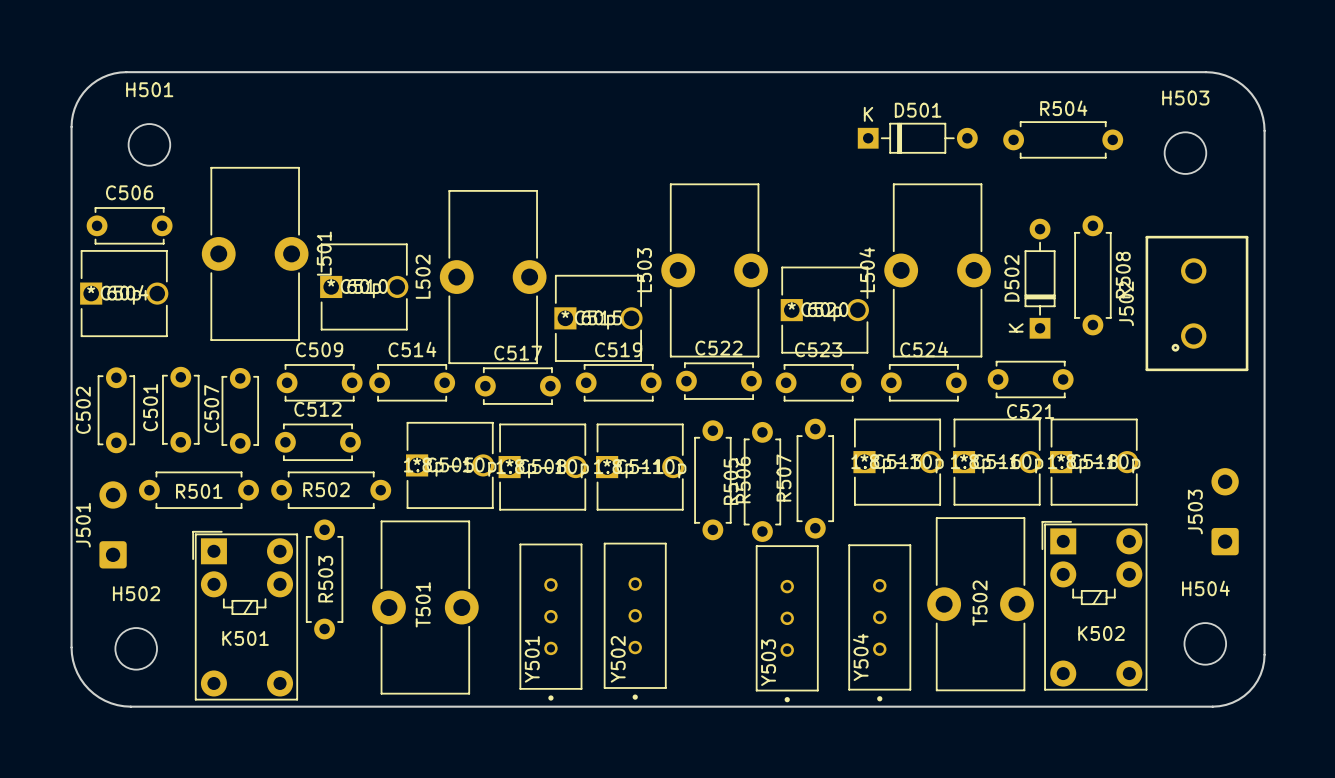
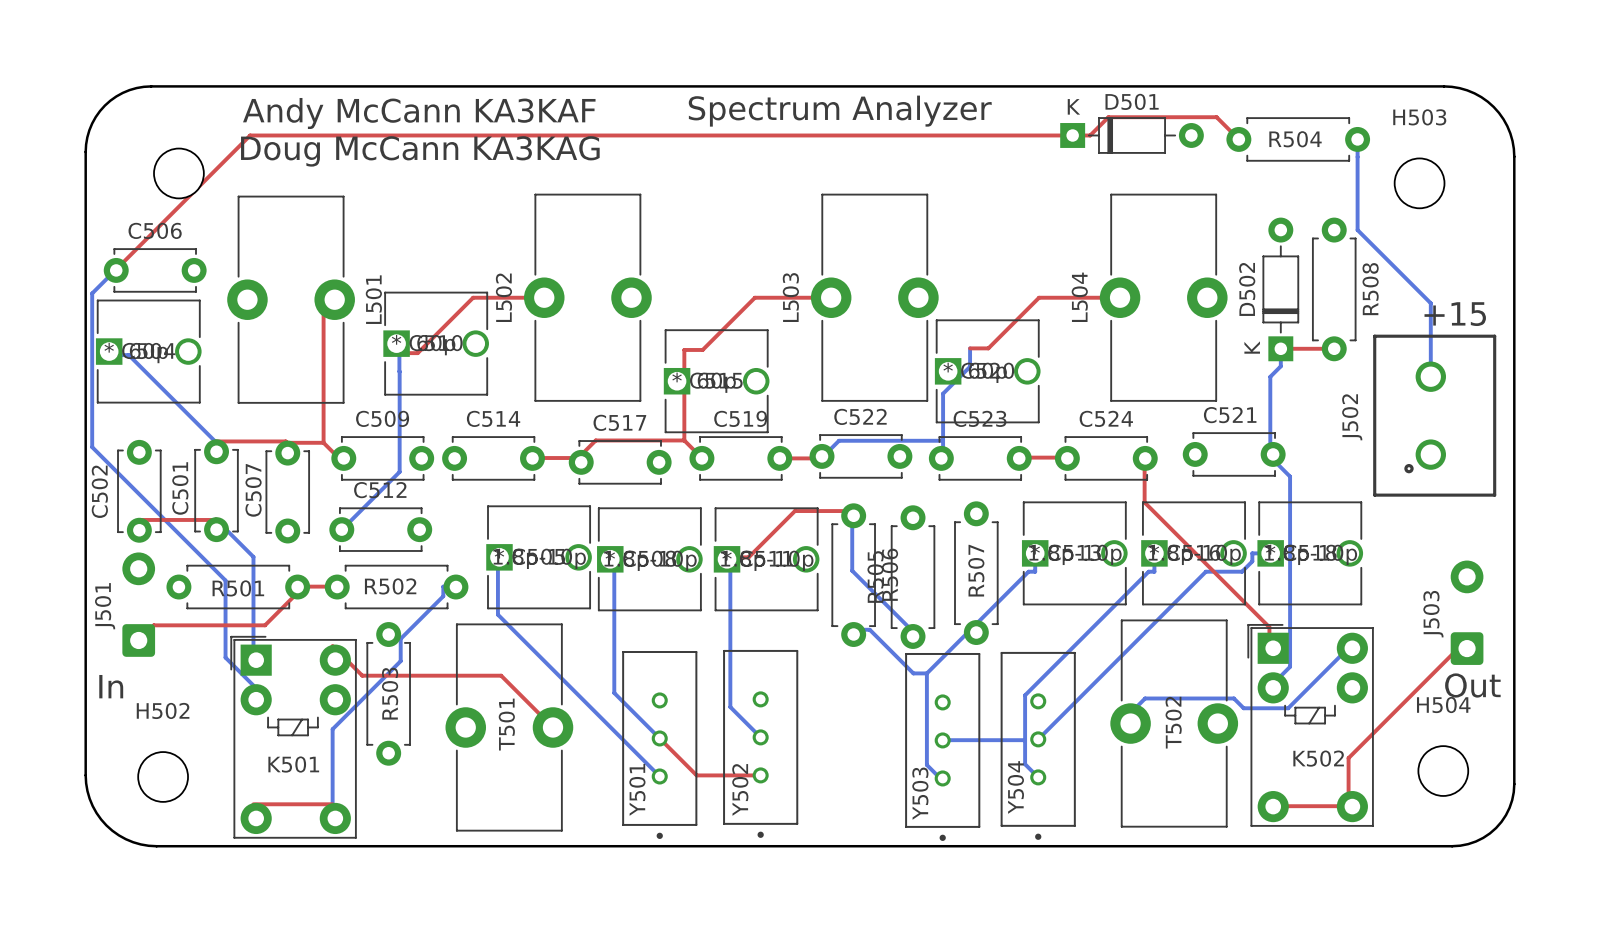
H501 name: H501 (149, 89) -> none
text: none -> Spectrum Analyzer (840, 111)
text: none -> Andy McCann KA3KAF (419, 113)
R504 name position: R504 (1063, 108) -> R504 (1295, 139)
top track: none -> (1238, 139) (1216, 117) (1108, 117) (1090, 135) (250, 135) (111, 273)
bottom track: none -> (1357, 139) (1357, 230) (1430, 303) (1430, 376)
text: none -> Doug McCann KA3KAG (420, 151)
D501 position: (917, 138) -> (1132, 135)
R504 position: (1063, 139) -> (1298, 139)
bottom track: none -> (111, 273) (92, 293) (92, 447) (225, 580) (225, 657) (253, 685)
top track: none -> (544, 297) (473, 297) (417, 353) (399, 353)
top track: none -> (831, 297) (754, 297) (702, 349) (684, 349) (684, 440)
top track: none -> (1120, 297) (1039, 297) (988, 348) (970, 348)
top track: none -> (334, 299) (323, 310) (323, 442)
L501 position: (255, 253) -> (291, 299)
text: none -> +15 (1455, 314)
L503 position: (714, 270) -> (874, 297)
L504 position: (937, 270) -> (1163, 297)
R508 position: (1092, 275) -> (1334, 289)
L502 position: (493, 277) -> (587, 297)
D502 position: (1040, 278) -> (1280, 289)
bottom track: none -> (970, 348) (970, 366) (943, 393) (943, 457)
top track: none -> (1280, 348) (1334, 348)
bottom track: none -> (1280, 348) (1280, 366) (1270, 376) (1270, 456) (1290, 476) (1290, 666) (1269, 687)
bottom track: none -> (399, 353) (399, 471) (337, 534)
bottom track: none -> (110, 355) (128, 355) (215, 441)
J502 position: (1196, 303) -> (1434, 415)
top track: none -> (684, 440) (595, 440) (578, 458) (532, 458)
top track: none -> (684, 440) (701, 458)
top track: none -> (215, 441) (323, 442)
bottom track: none -> (943, 440) (838, 440) (821, 458)
top track: none -> (323, 442) (339, 458)
top track: none -> (779, 458) (821, 458)
top track: none -> (1020, 457) (1066, 457)
top track: none -> (1144, 457) (1144, 502) (1269, 627) (1269, 647)
C521 name position: C521 (1030, 411) -> C521 (1230, 415)
top track: none -> (852, 511) (794, 511) (748, 557) (730, 557)
bottom track: none -> (852, 511) (852, 570) (911, 629)
top track: none -> (215, 519) (138, 519)
bottom track: none -> (215, 519) (253, 556) (253, 645)
bottom track: none -> (1035, 553) (1035, 571) (1028, 571) (926, 673)
bottom track: none -> (1154, 553) (1154, 571) (1148, 571) (1025, 695) (1025, 764) (1038, 777)
bottom track: none -> (1270, 553) (1252, 553) (1252, 561) (1242, 571) (1205, 571) (1038, 739)
bottom track: none -> (497, 556) (497, 614) (659, 776)
bottom track: none -> (614, 556) (614, 693) (659, 738)
bottom track: none -> (730, 557) (730, 707) (760, 737)
R507 name position: R507 (784, 478) -> R507 (976, 570)
top track: none -> (342, 586) (303, 586) (265, 625) (153, 625) (138, 640)
bottom track: none -> (460, 586) (443, 586) (443, 596) (400, 638) (400, 661) (332, 729) (332, 804)
J501 position: (113, 524) -> (138, 604)
bottom track: none -> (852, 629) (869, 629) (913, 673) (926, 673)
top track: none -> (1471, 635) (1348, 758) (1348, 806) (1269, 806)
top track: none -> (332, 645) (362, 675) (501, 675) (552, 727)
bottom track: none -> (1348, 647) (1288, 708) (1243, 708) (1233, 698) (1145, 698) (1119, 724)
bottom track: none -> (926, 673) (926, 765) (940, 778)
text: none -> Out (1472, 685)
text: none -> In (111, 686)
top track: none -> (659, 738) (696, 775) (760, 775)
bottom track: none -> (940, 740) (1025, 740)
Y504 position: (879, 622) -> (1038, 745)
top track: none -> (253, 804) (332, 804)

